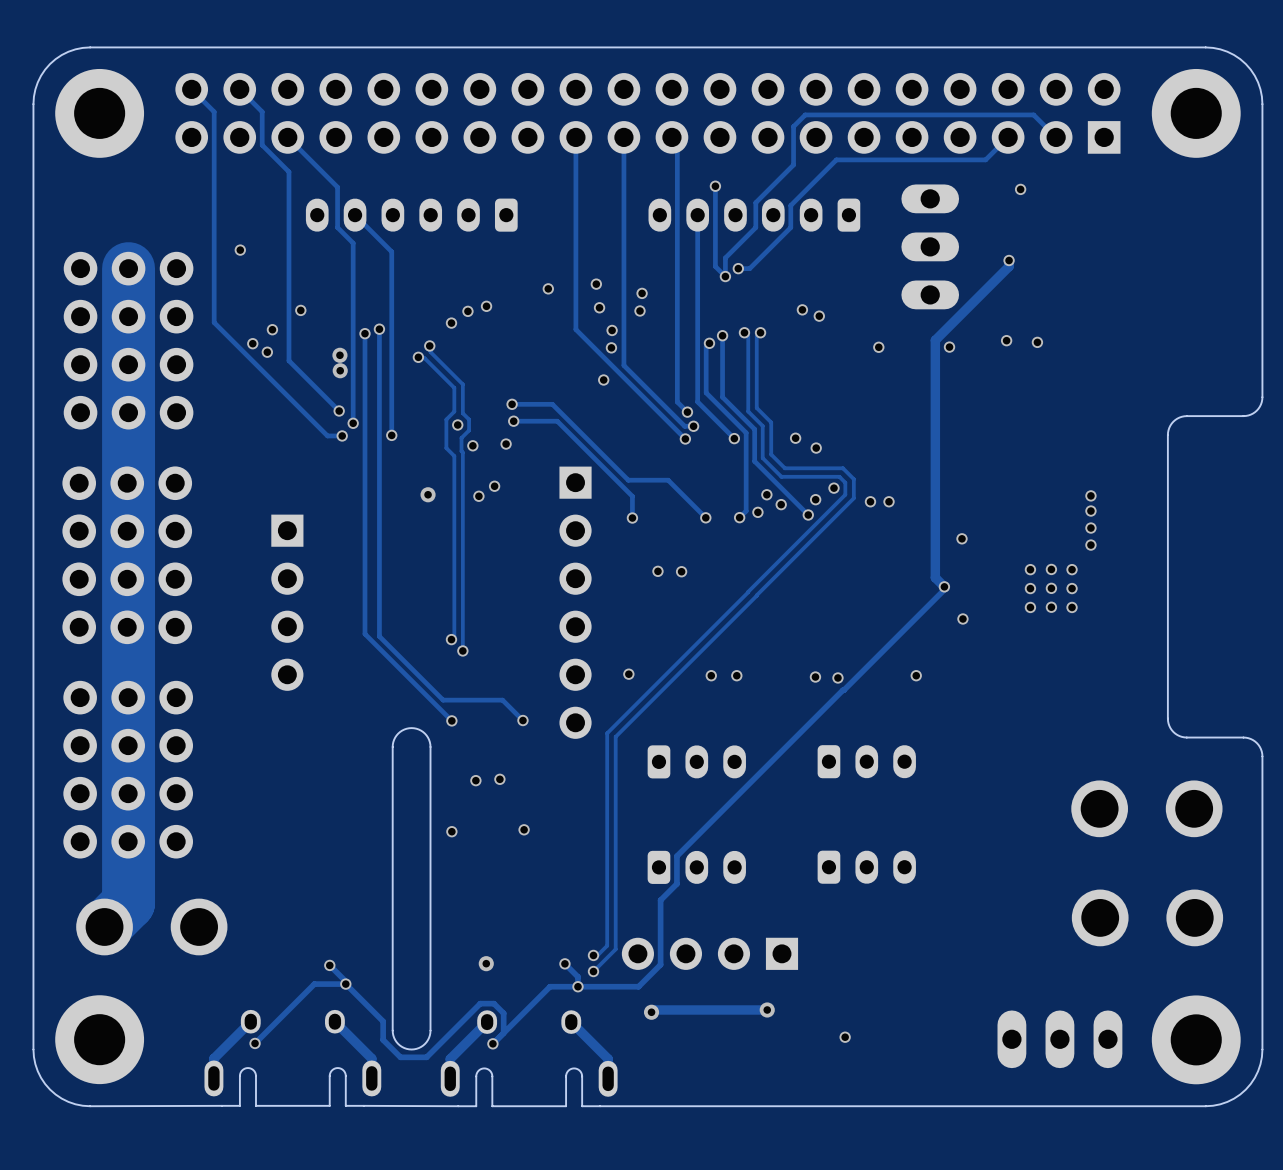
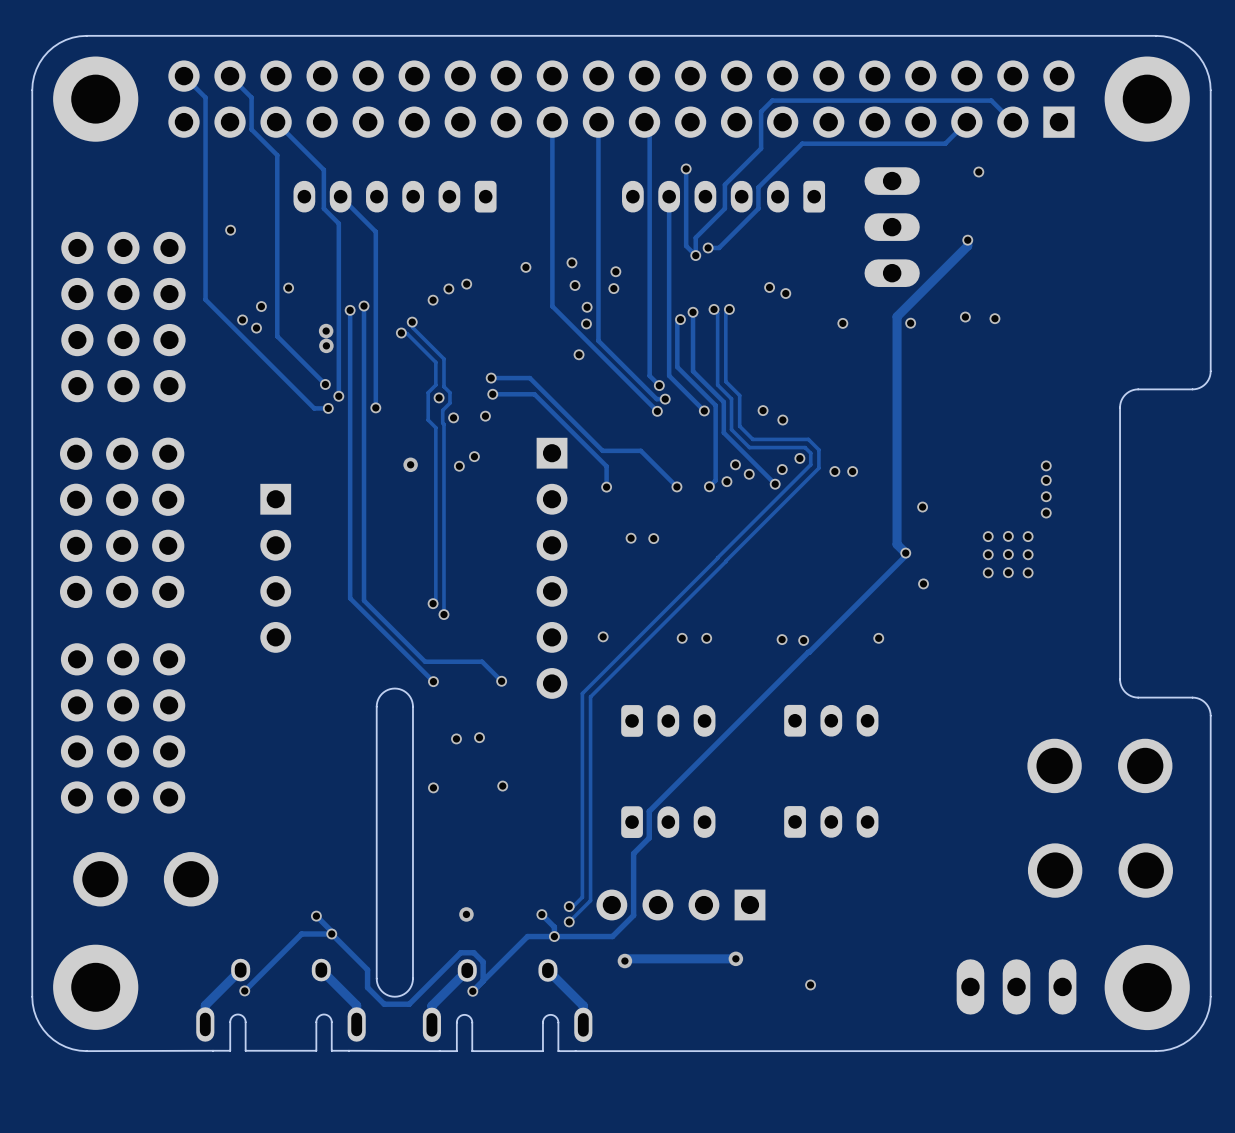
track: (128, 268) (128, 902) (104, 926) -> none

